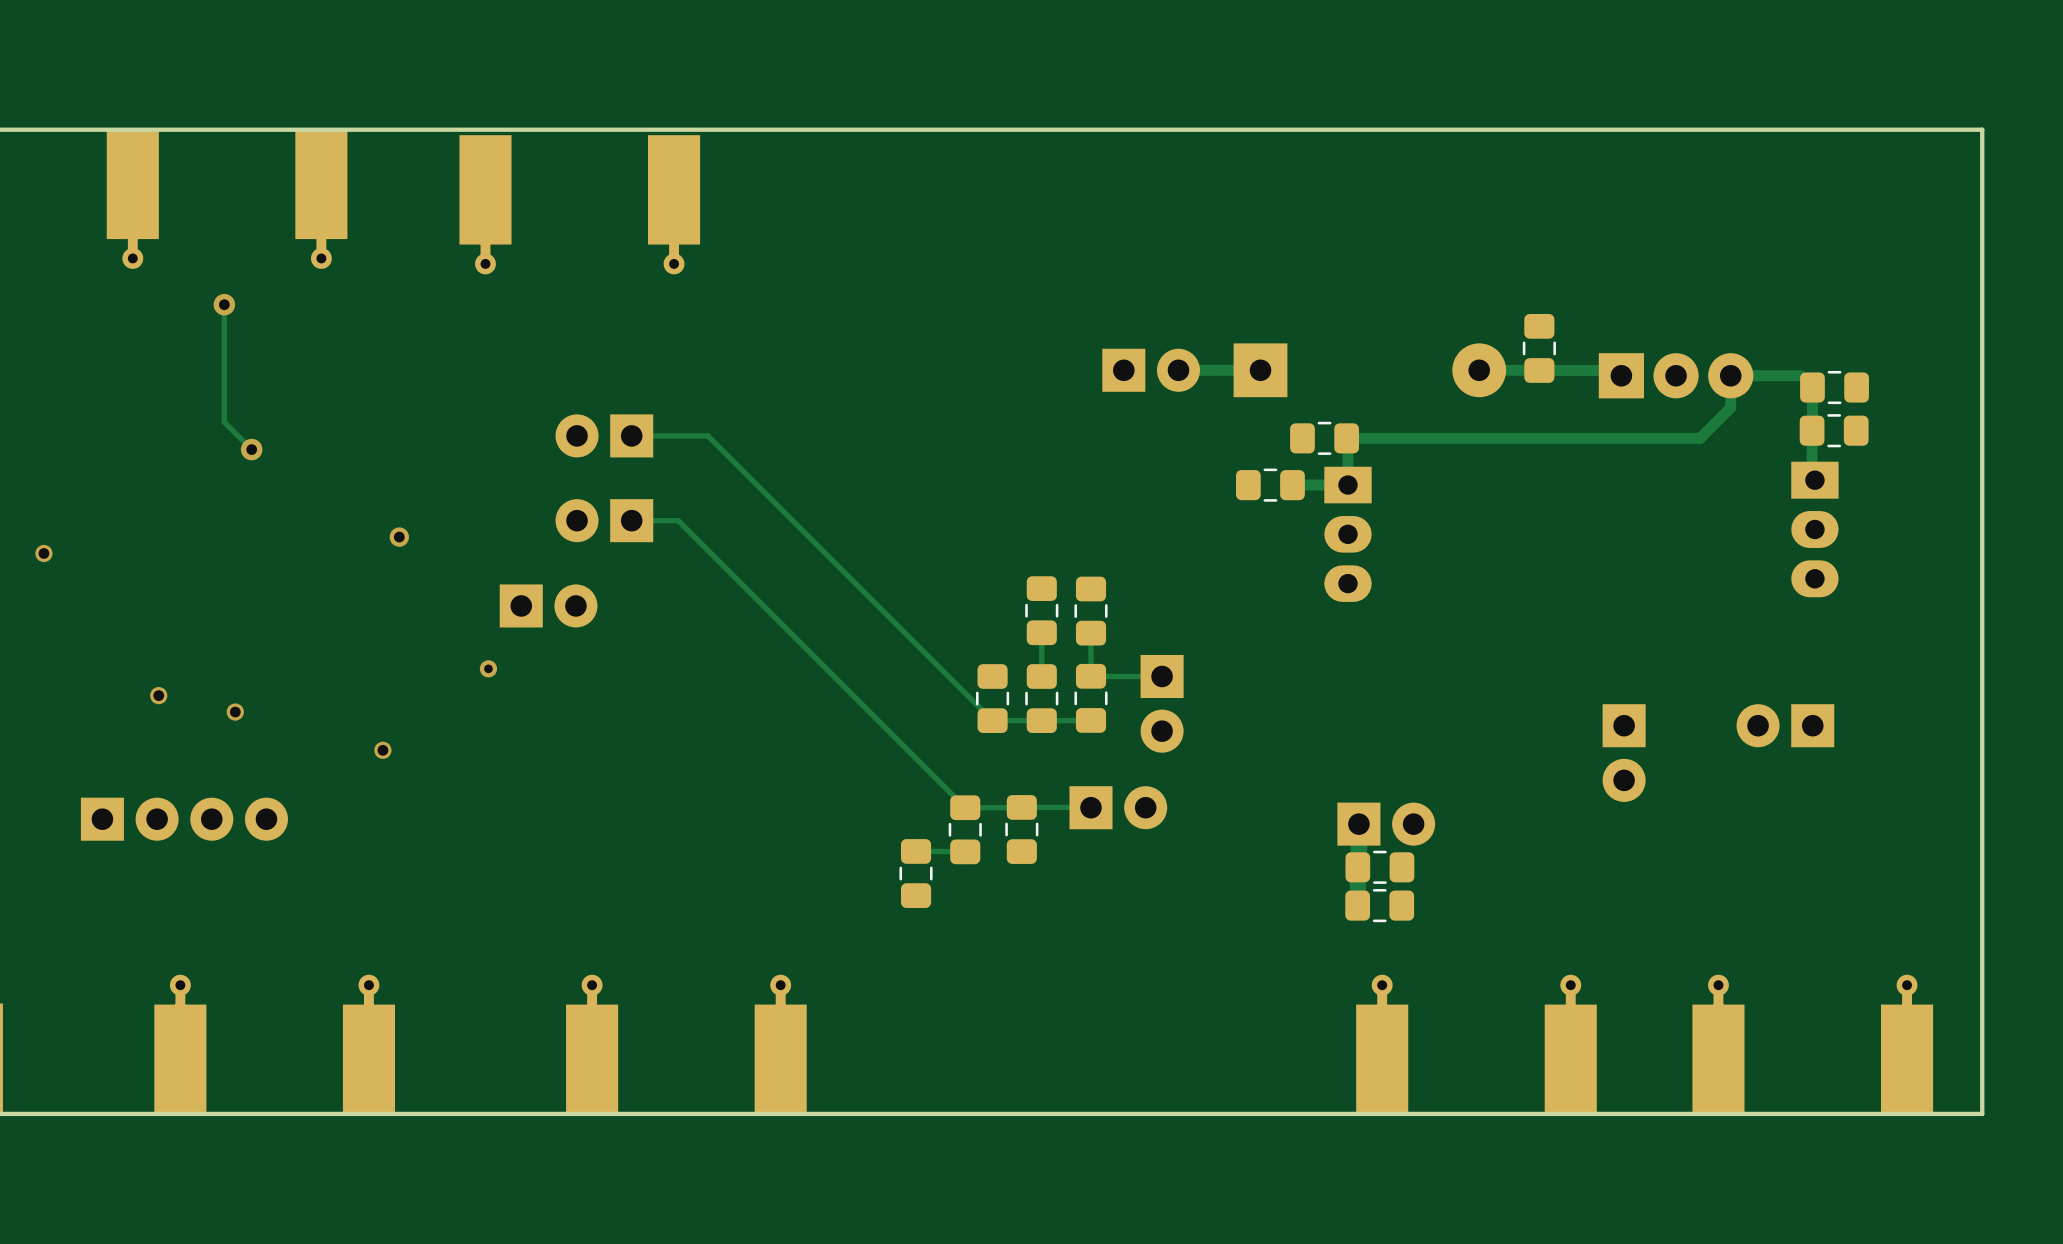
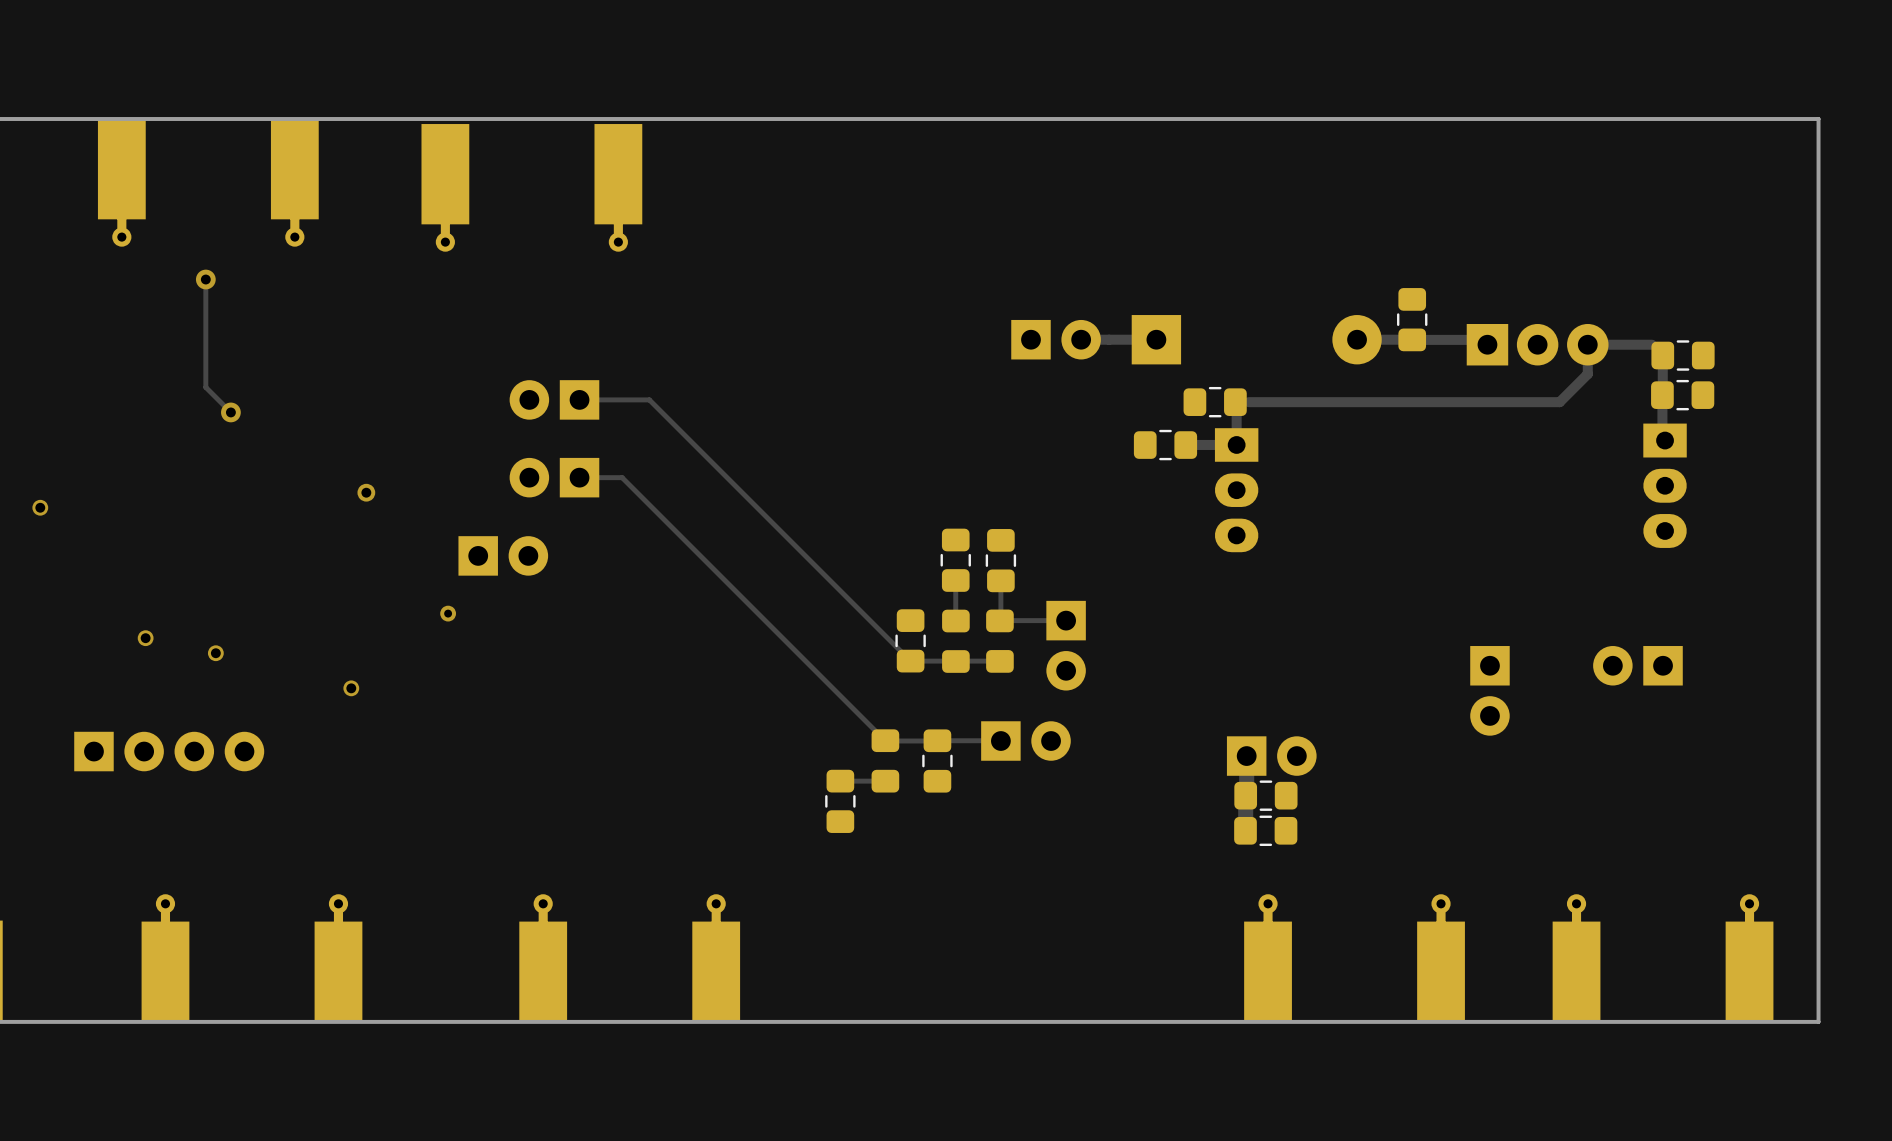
part side: bottom (1041, 698) -> top (955, 641)
part side: bottom (1091, 698) -> top (999, 641)
part side: bottom (965, 829) -> top (885, 760)

